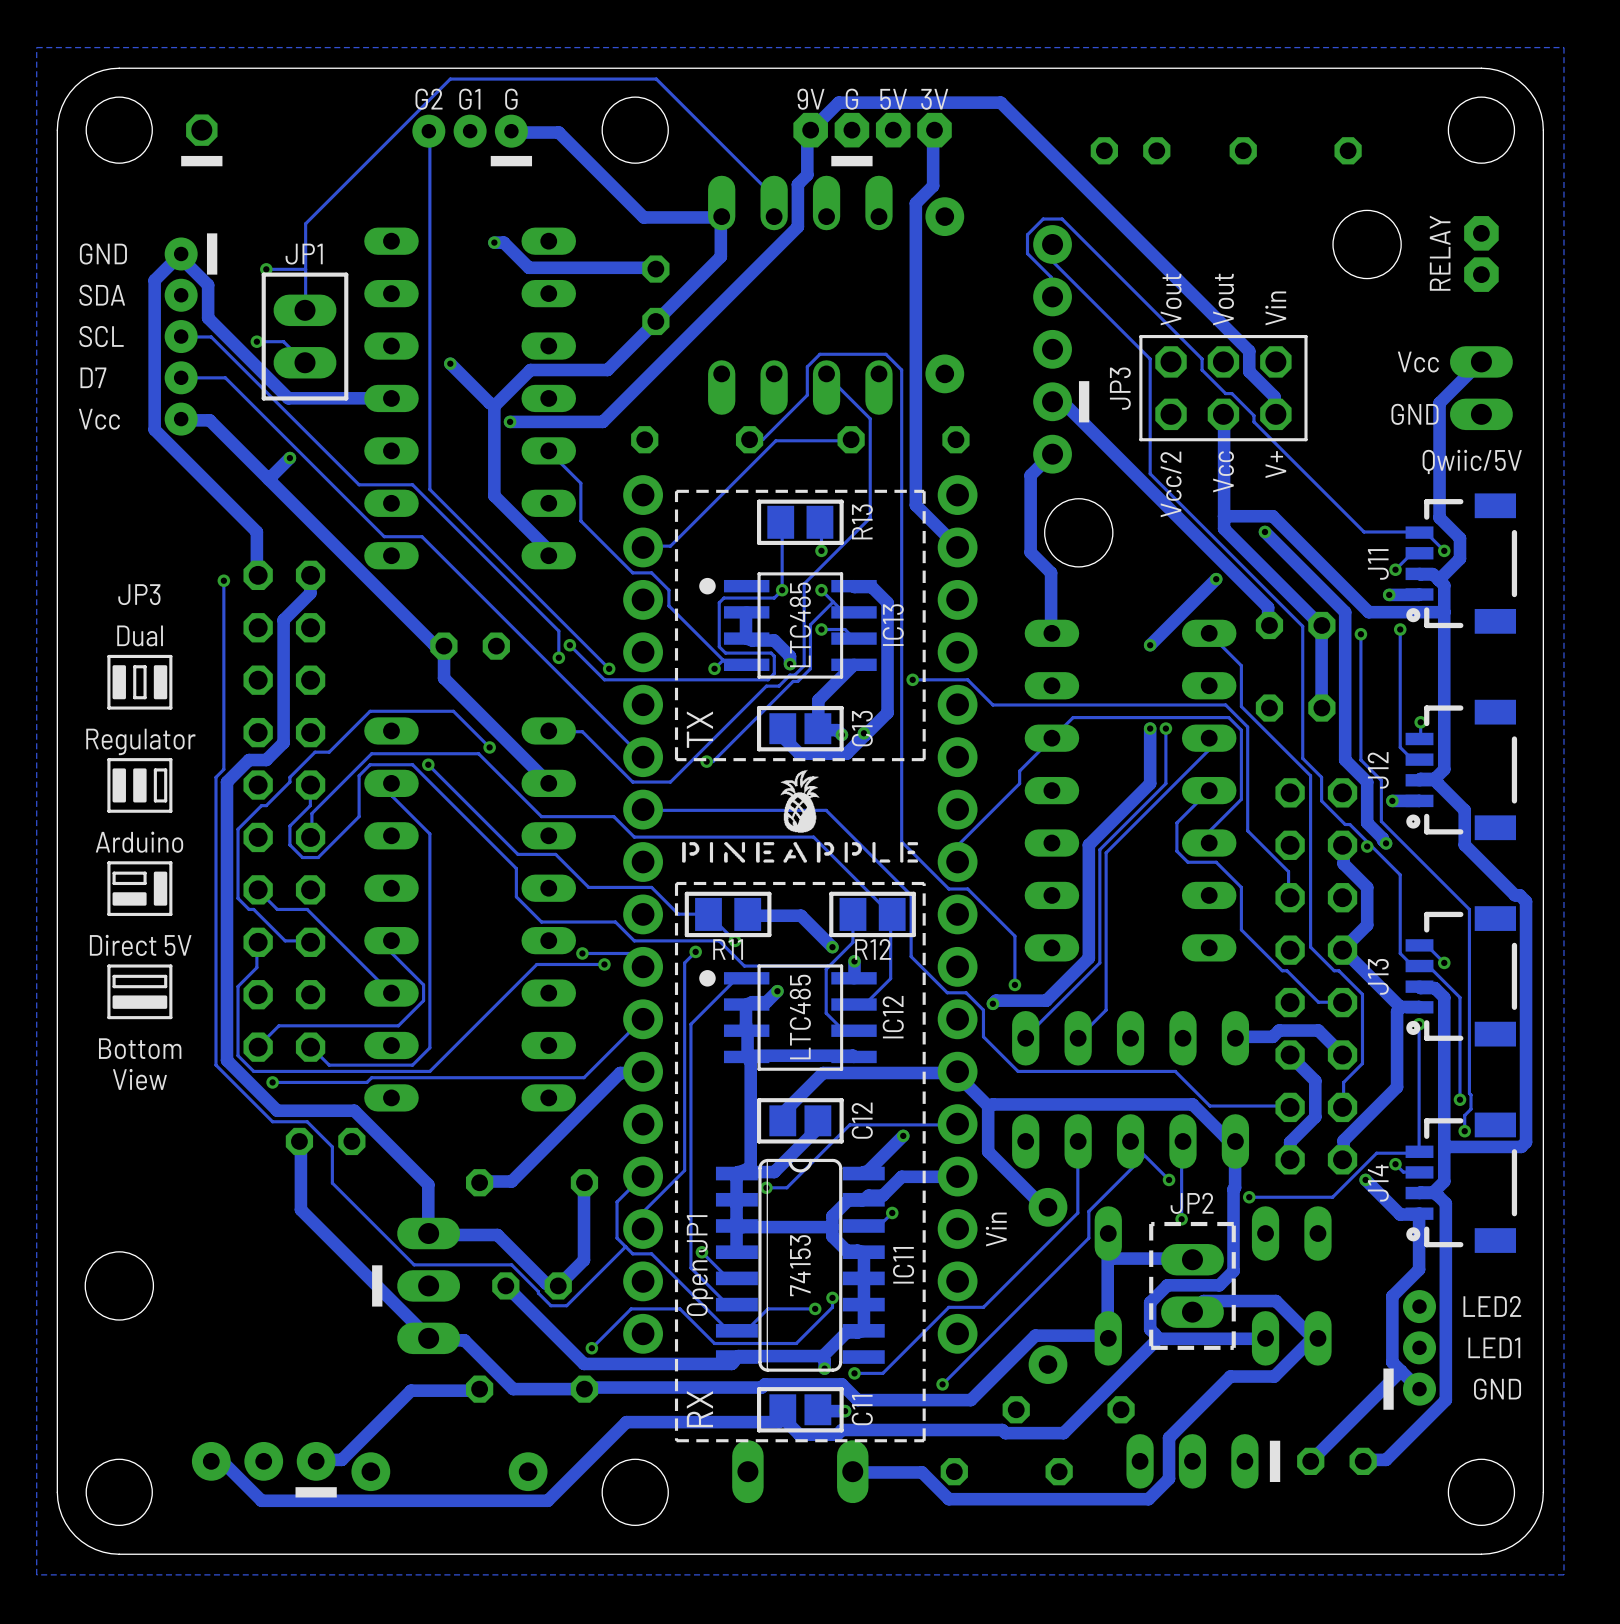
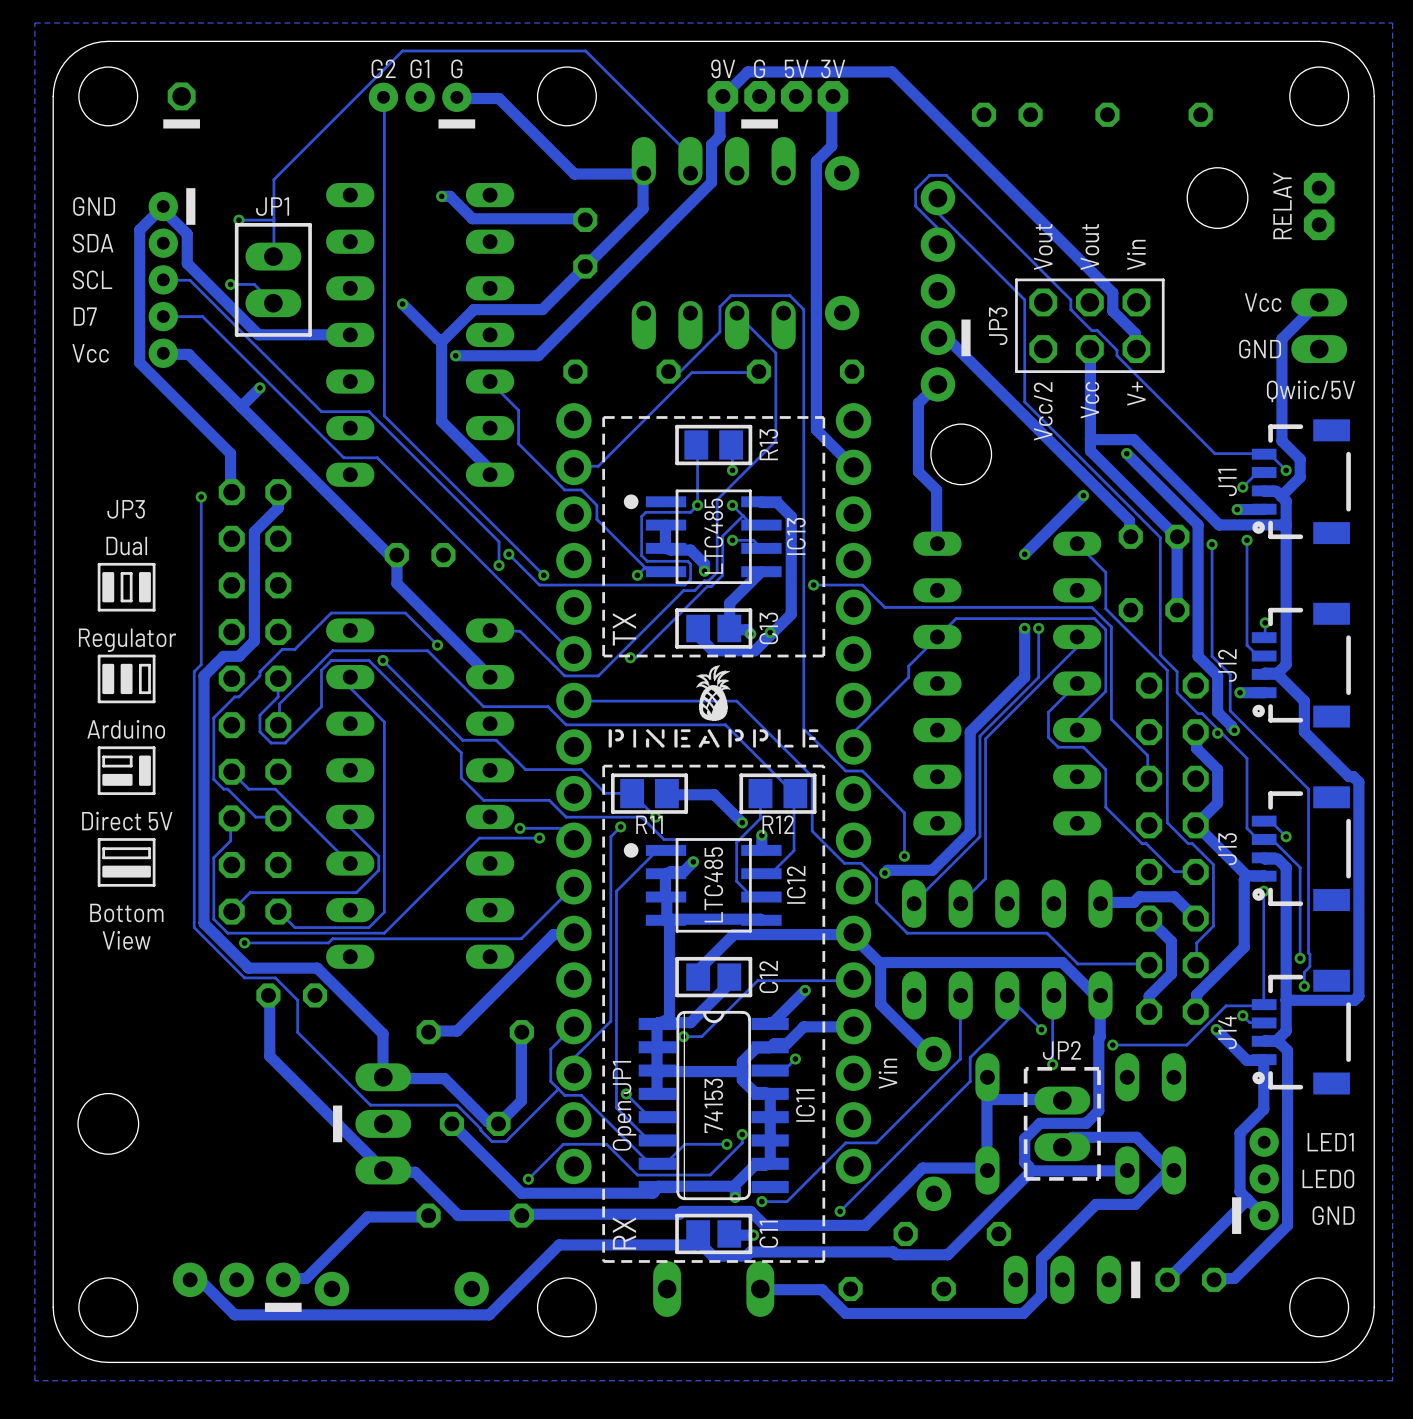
text: LED2 (1492, 1306) -> LED1 (1330, 1142)
text: LED1 (1494, 1347) -> LED0 (1328, 1178)

